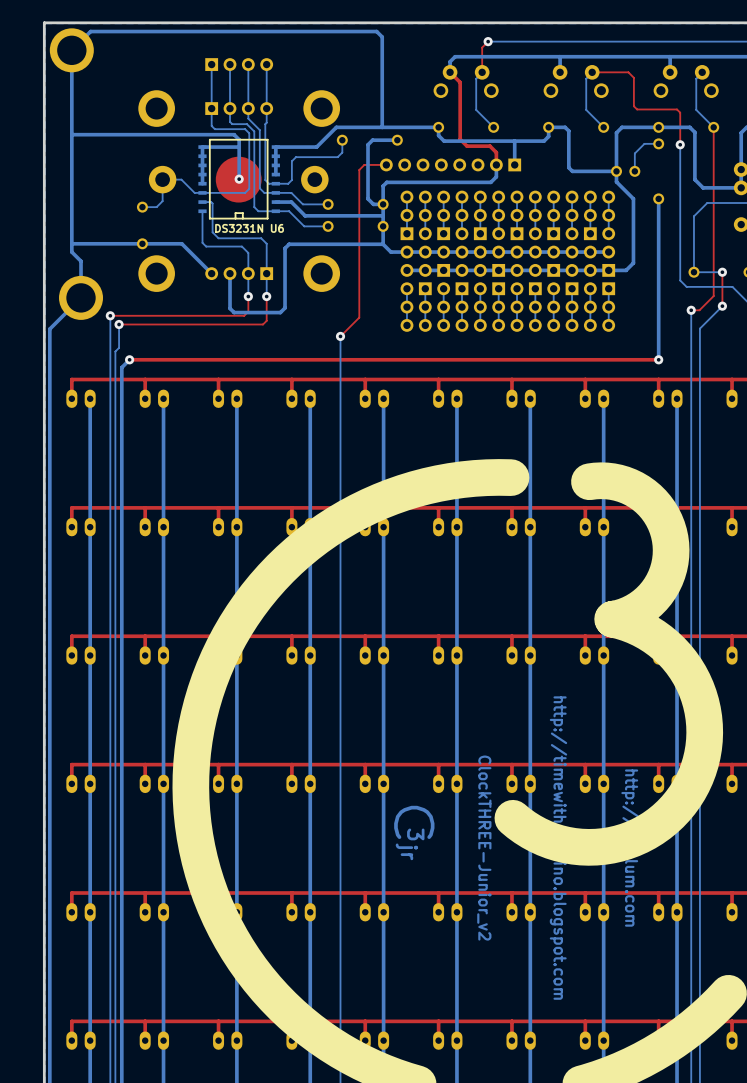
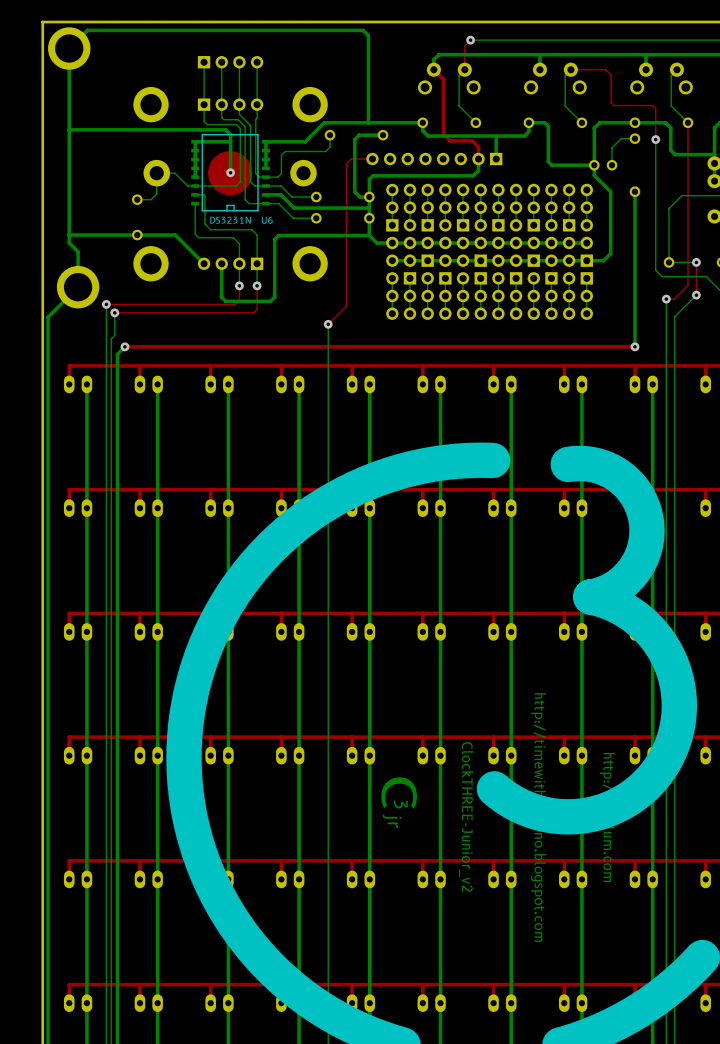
bottom track: (689, 127) (694, 132) (694, 179) (703, 187) (741, 187) (741, 178) -> (665, 122) (670, 128) (670, 150) (675, 154) (714, 154)

